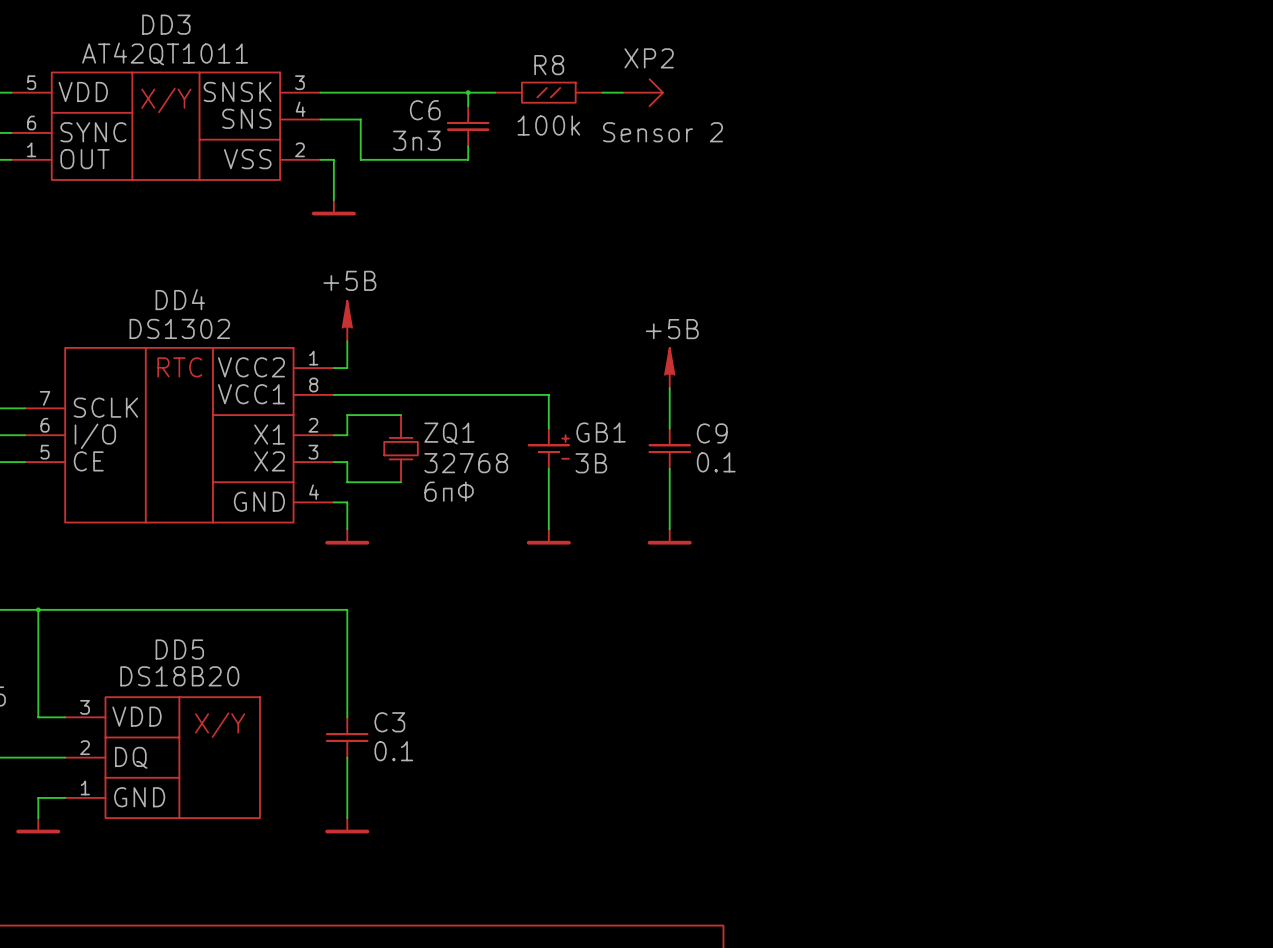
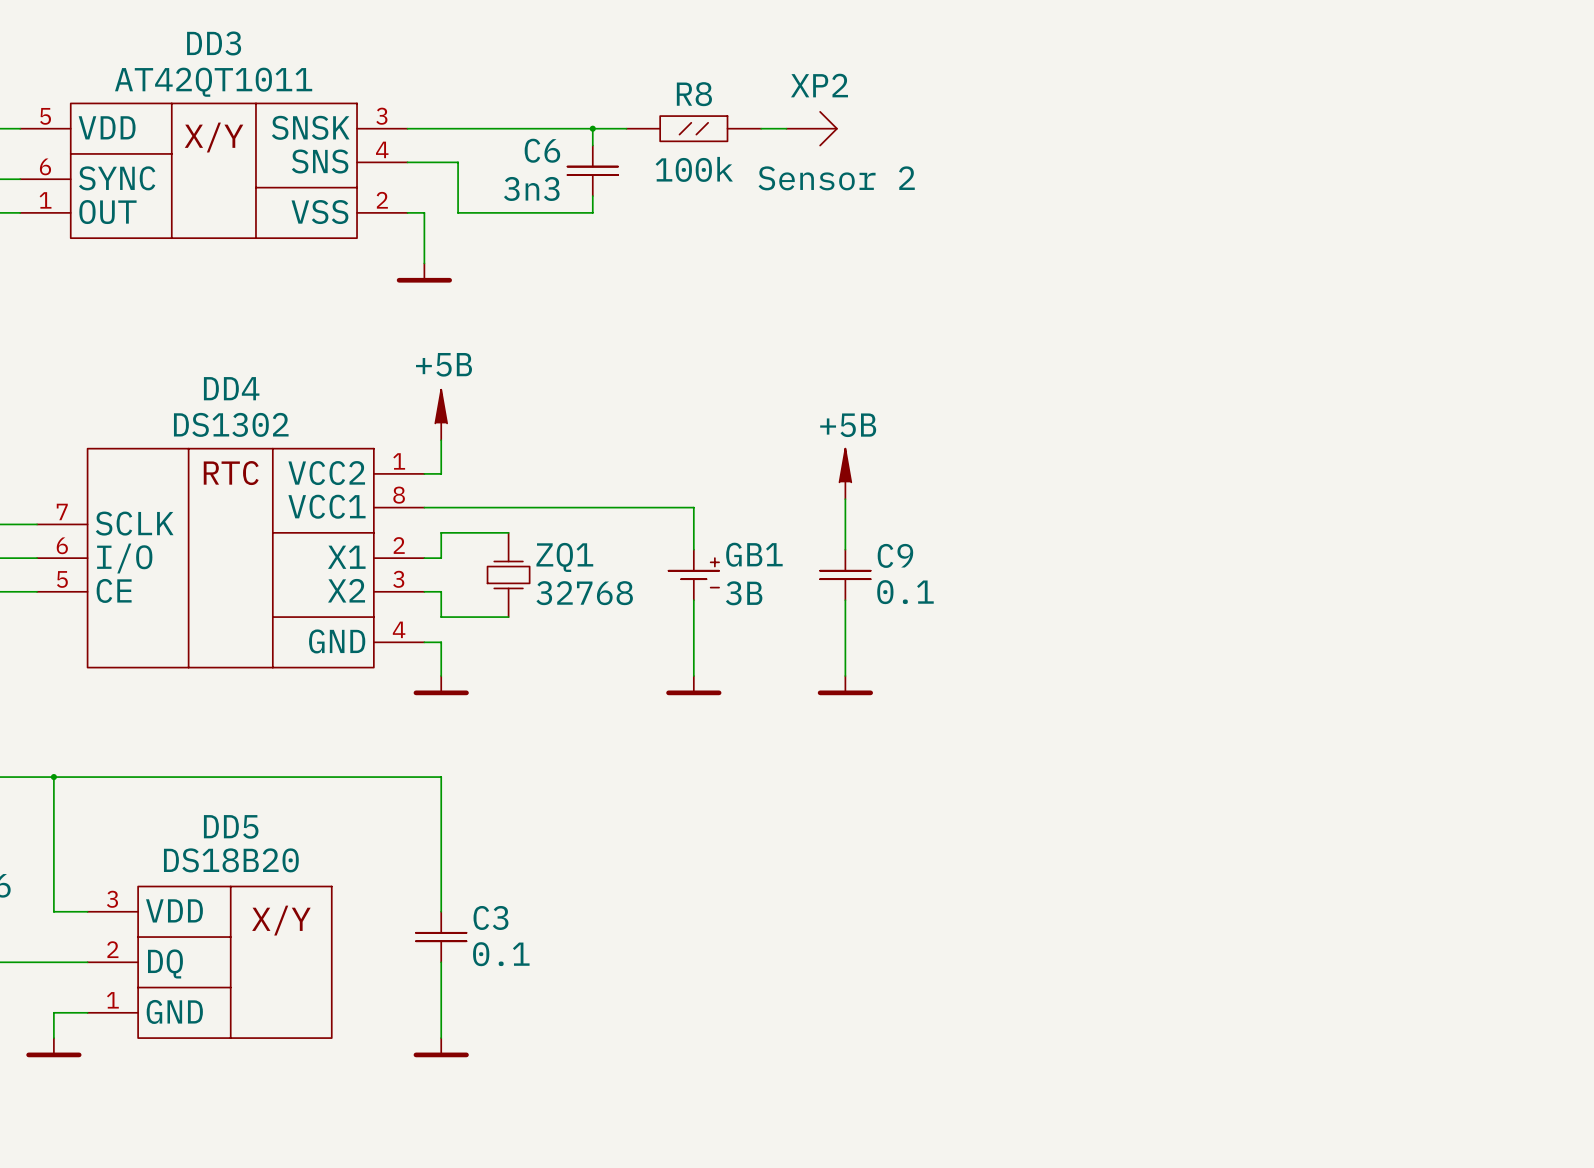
ZQ1 text: 6пФ (449, 491) -> none

